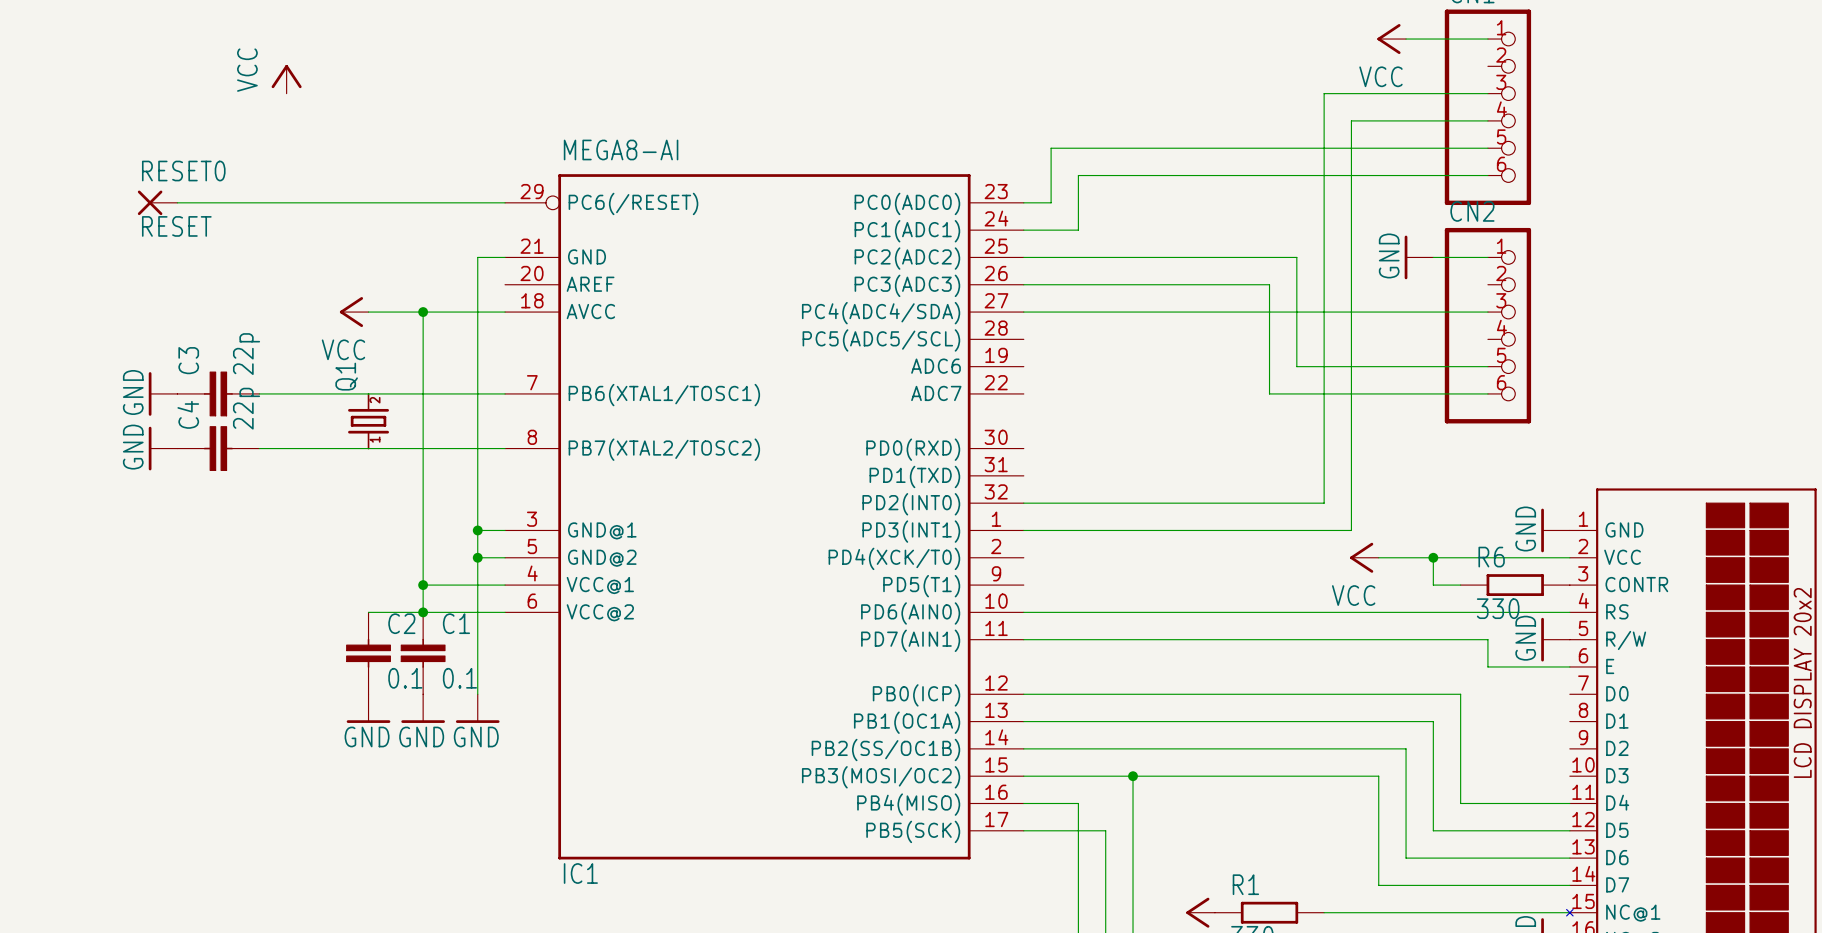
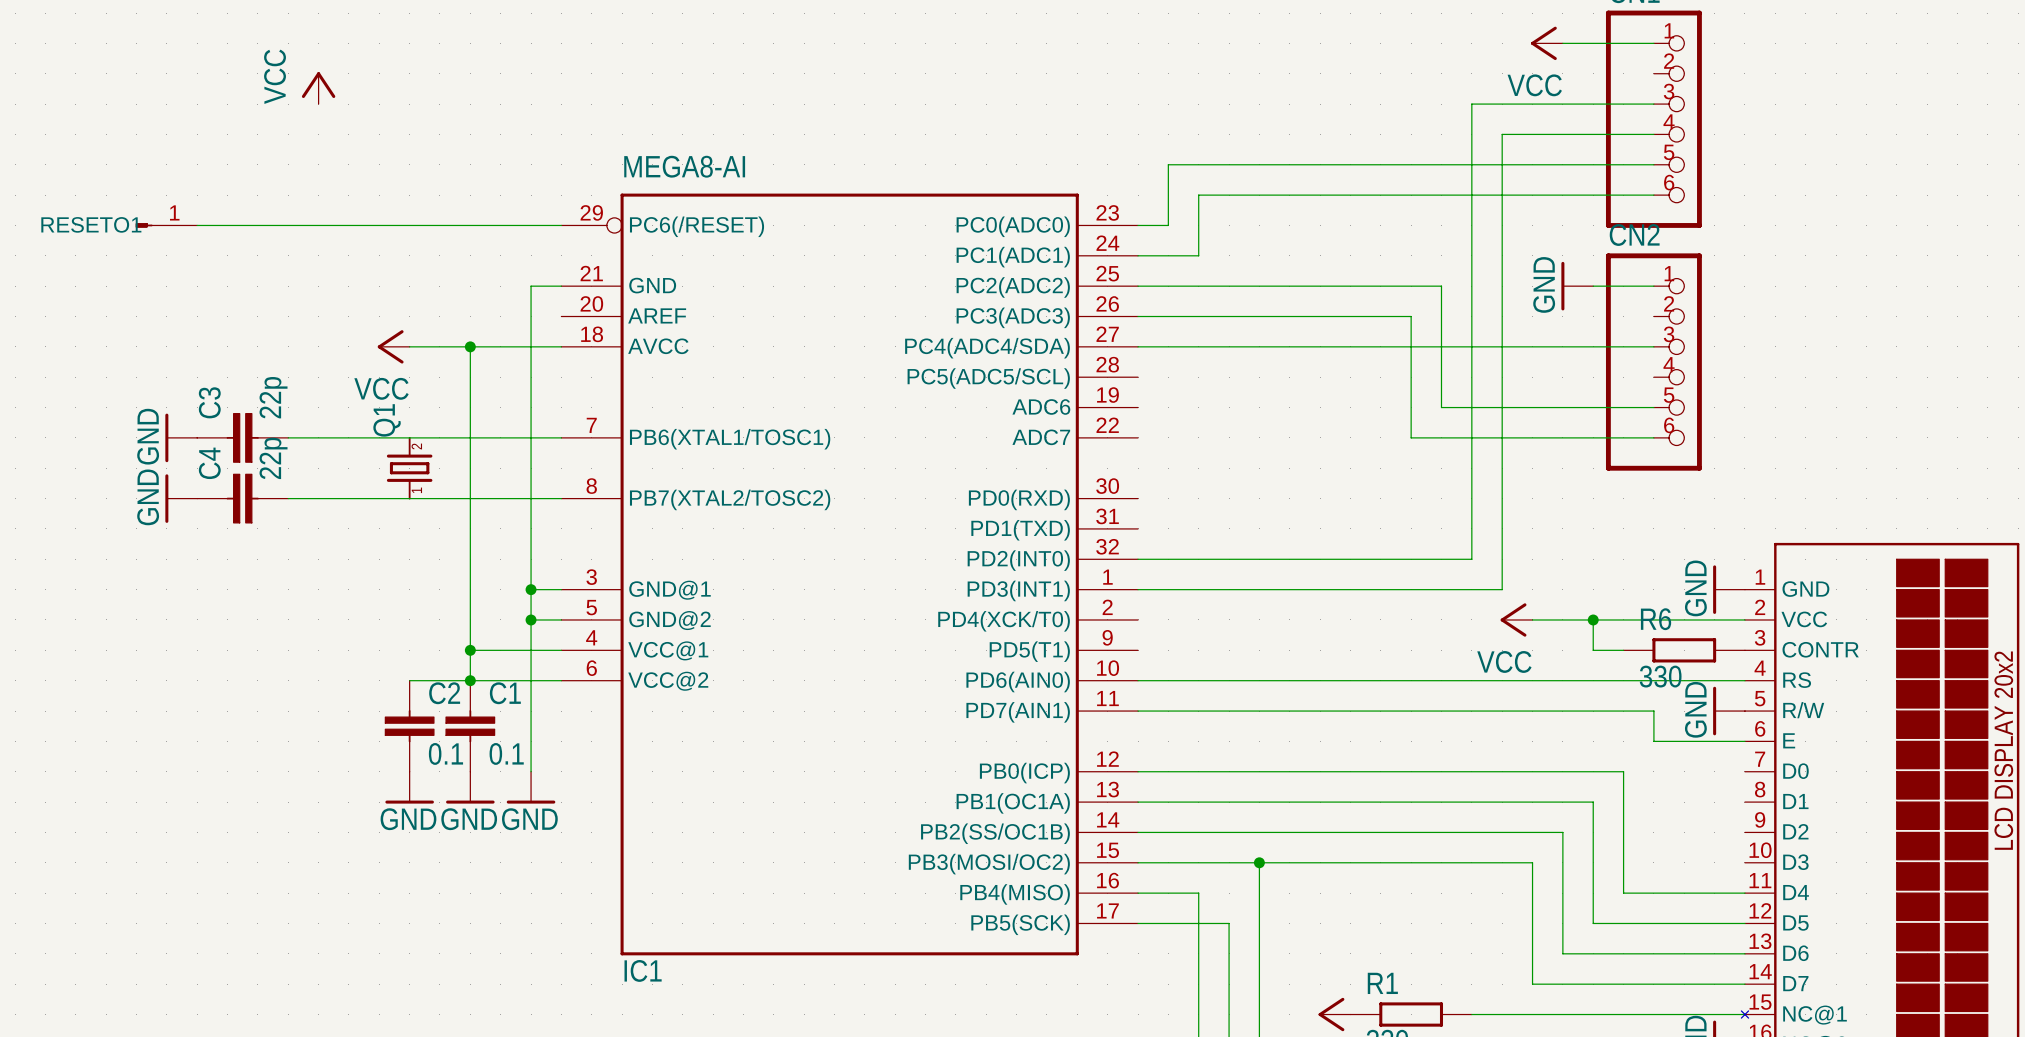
RESETO1: none -> (166, 225)
RESET0: RESET (157, 202) -> none

